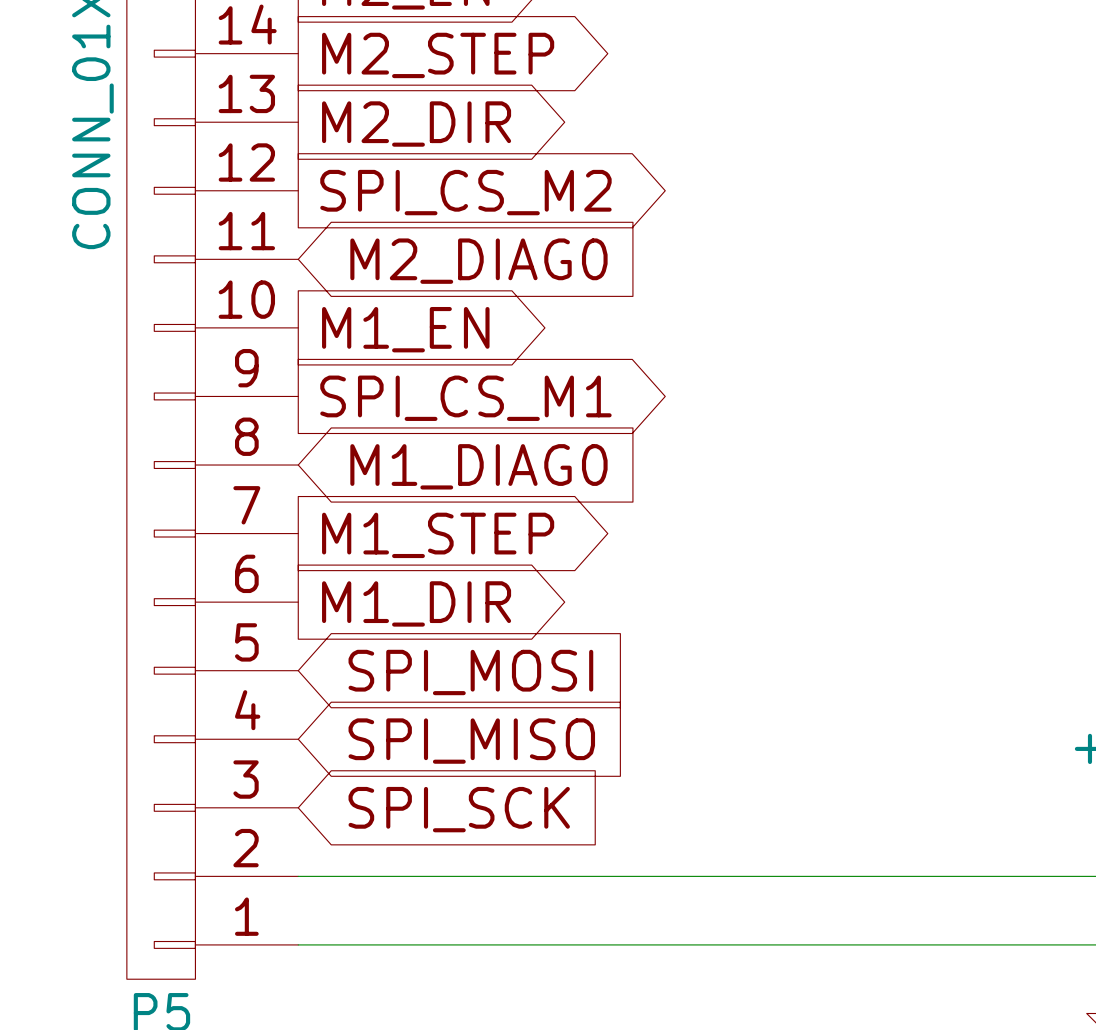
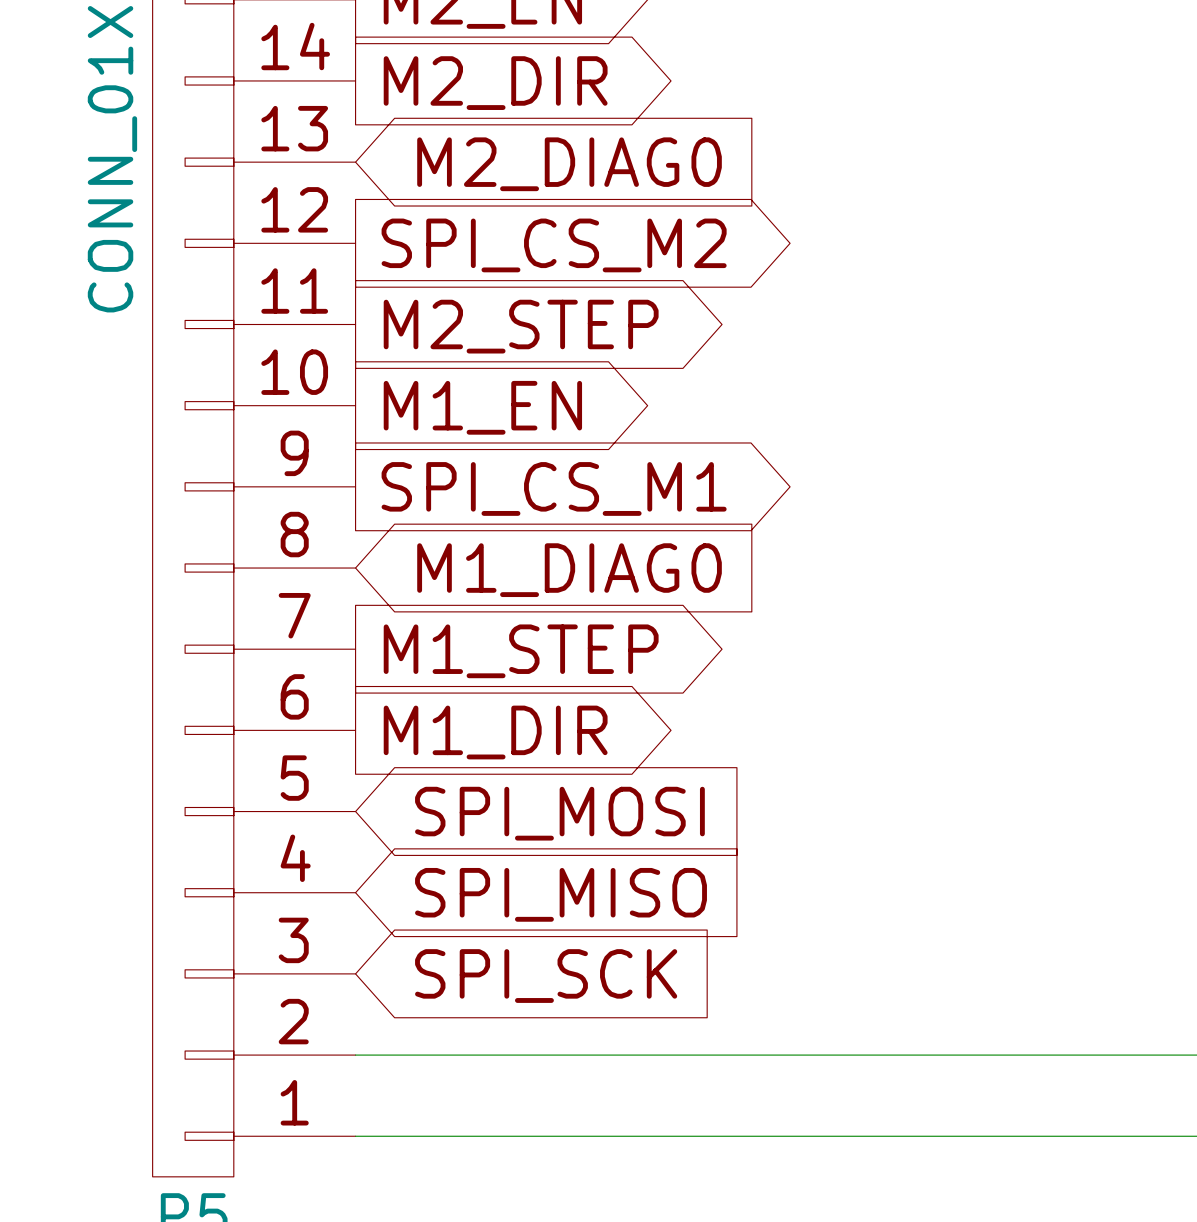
global label: M2_STEP (438, 55) -> M2_DIR (495, 83)
global label shape: output (416, 124) -> input (569, 164)
global label: M2_DIR (416, 124) -> M2_DIAG0 (569, 164)
global label shape: input (478, 261) -> output (521, 326)
global label: M2_DIAG0 (478, 261) -> M2_STEP (521, 326)

